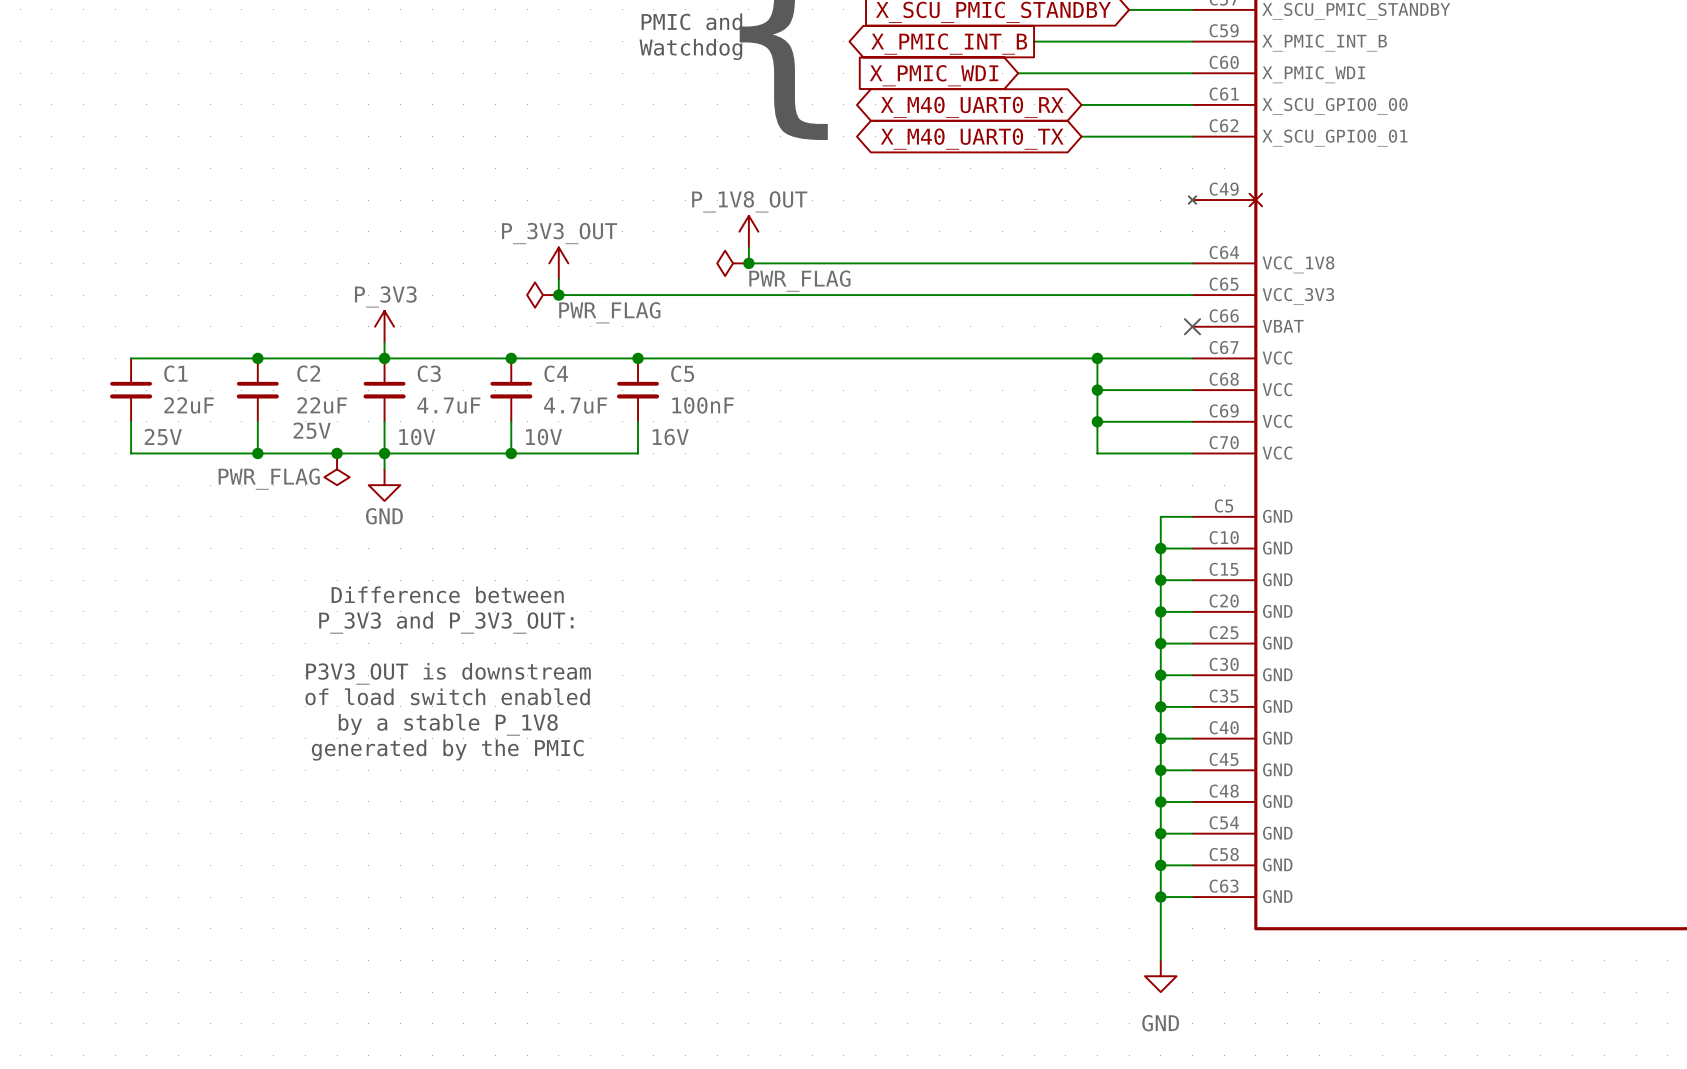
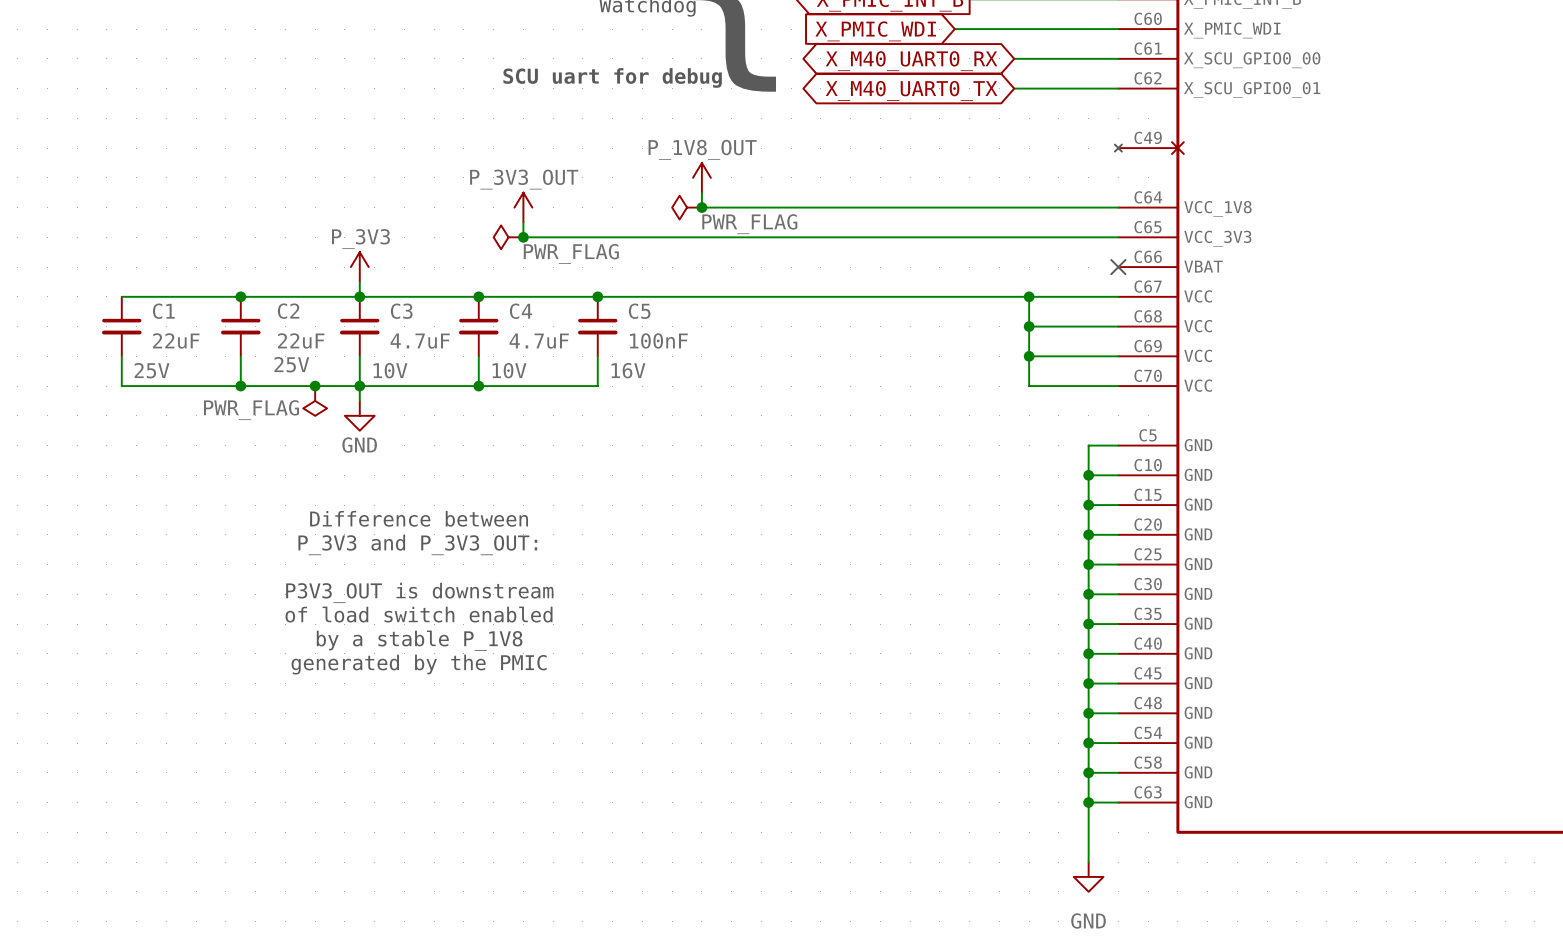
text: none -> SCU uart for debug (612, 77)

